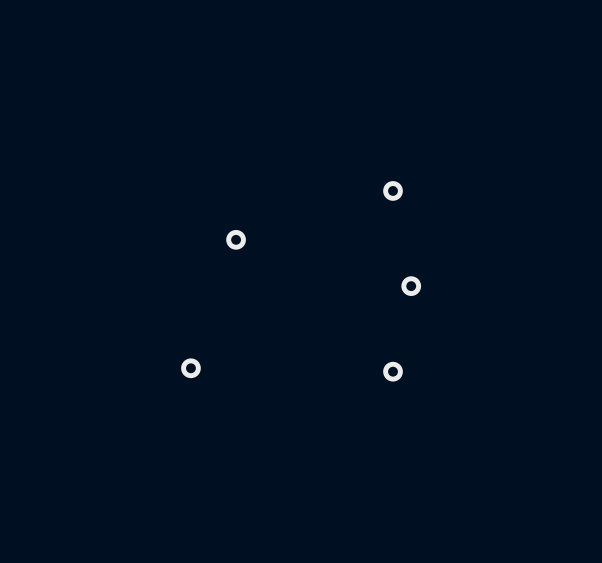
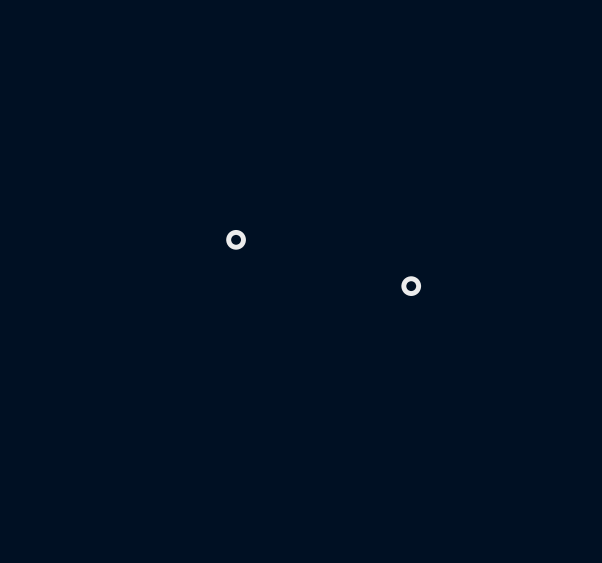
via: (393, 190) -> none
via: (190, 368) -> none
via: (393, 371) -> none

